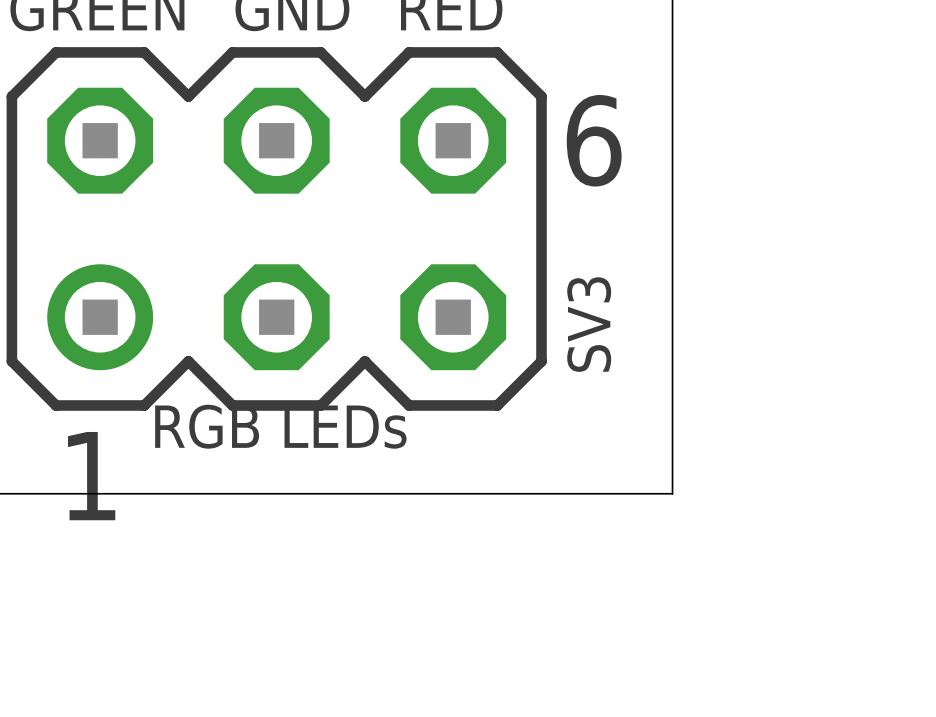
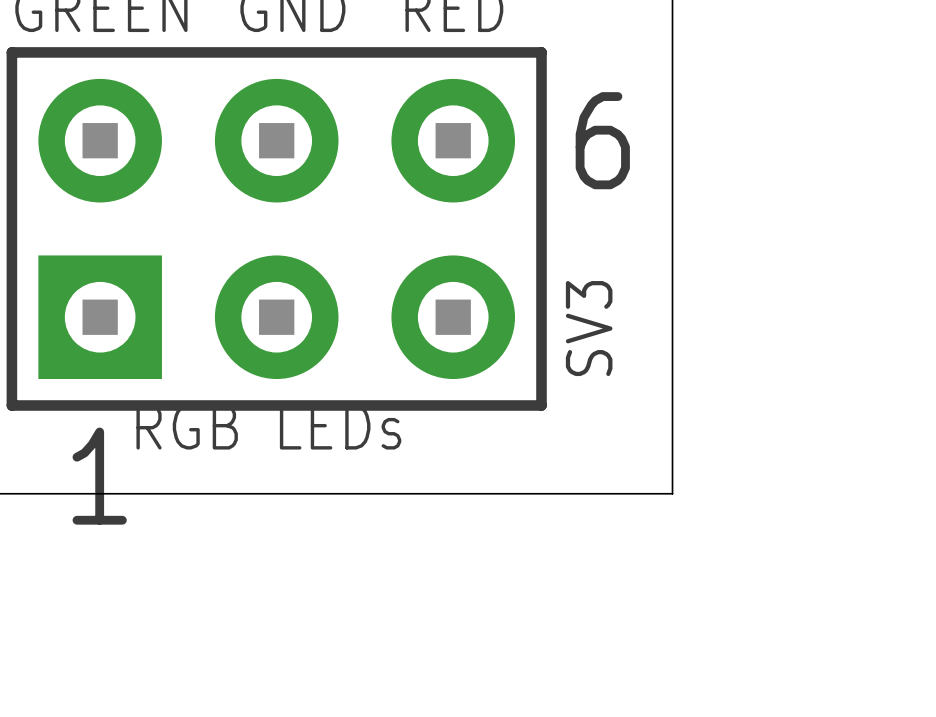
SV3 footprint: [6, 47, 547, 411] -> [6, 47, 547, 411]

